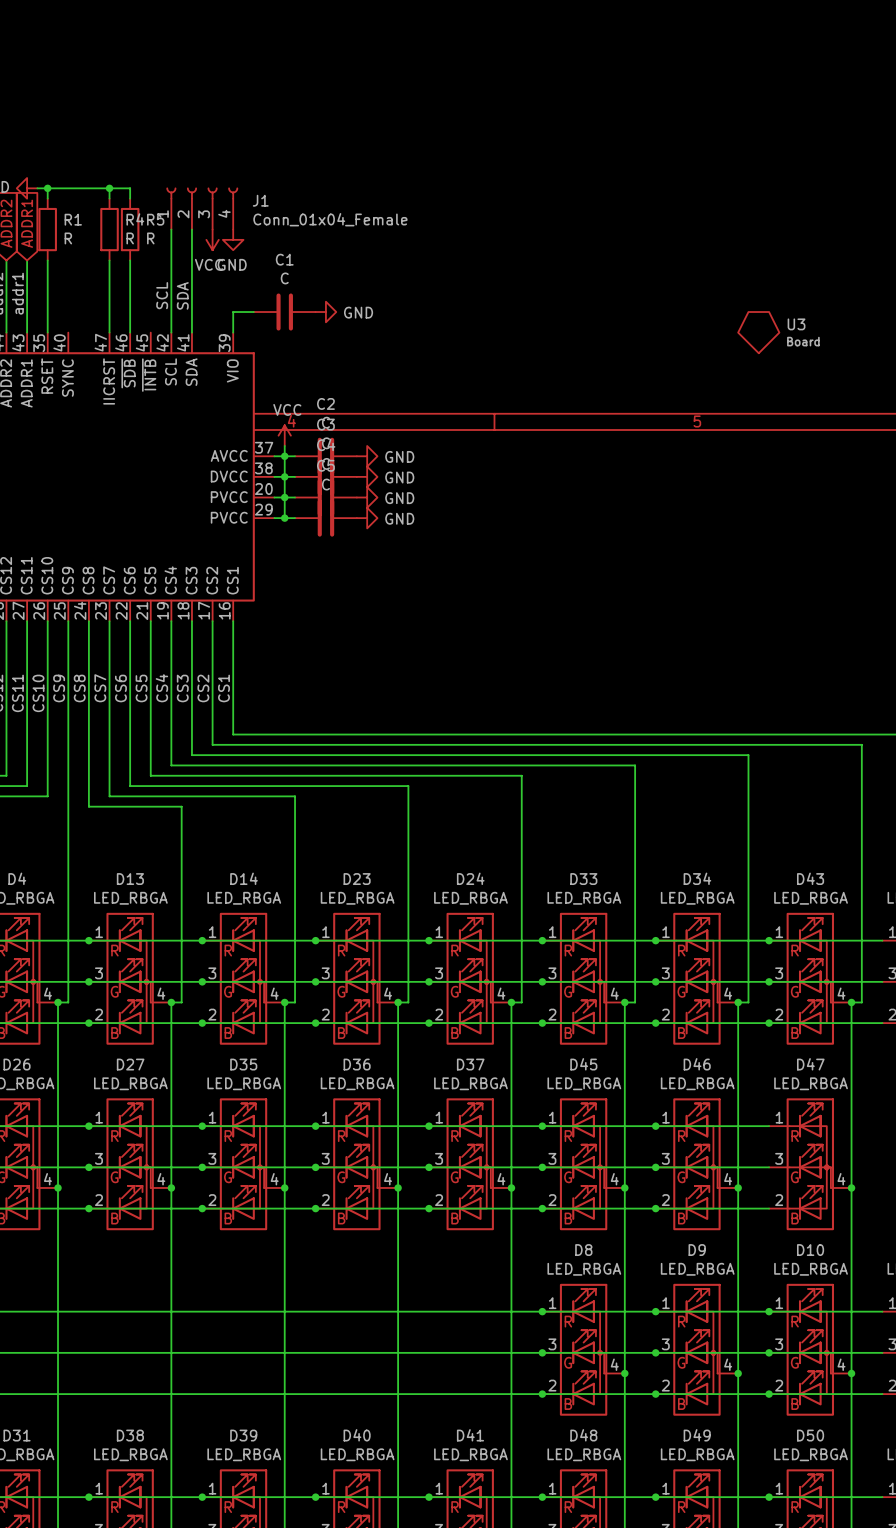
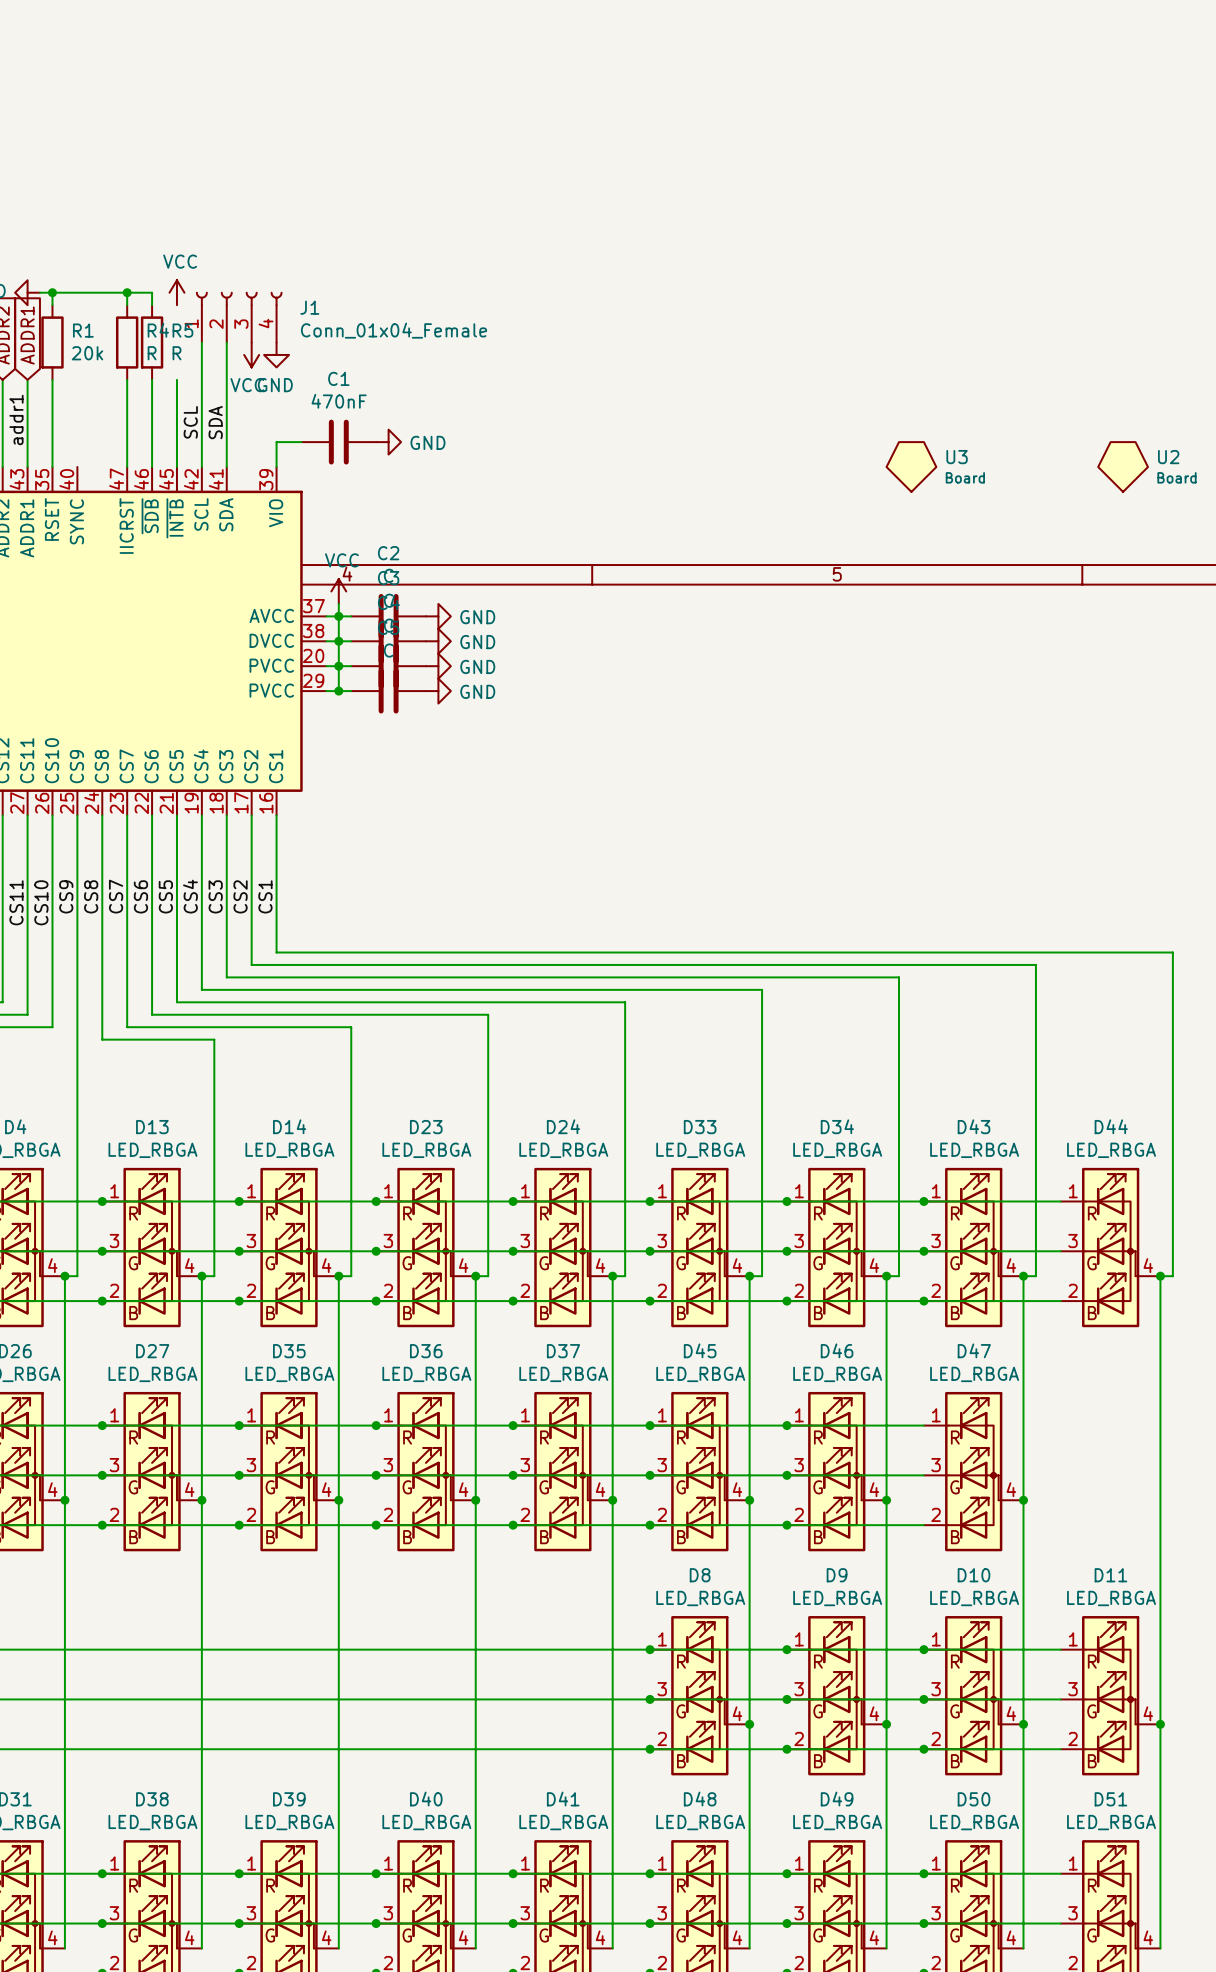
power symbol: none -> VCC (176, 292)
R1 value: R (68, 238) -> 20k (87, 353)
wire: none -> (176, 379) (176, 467)
C1 value: C (284, 278) -> 470nF (339, 401)

